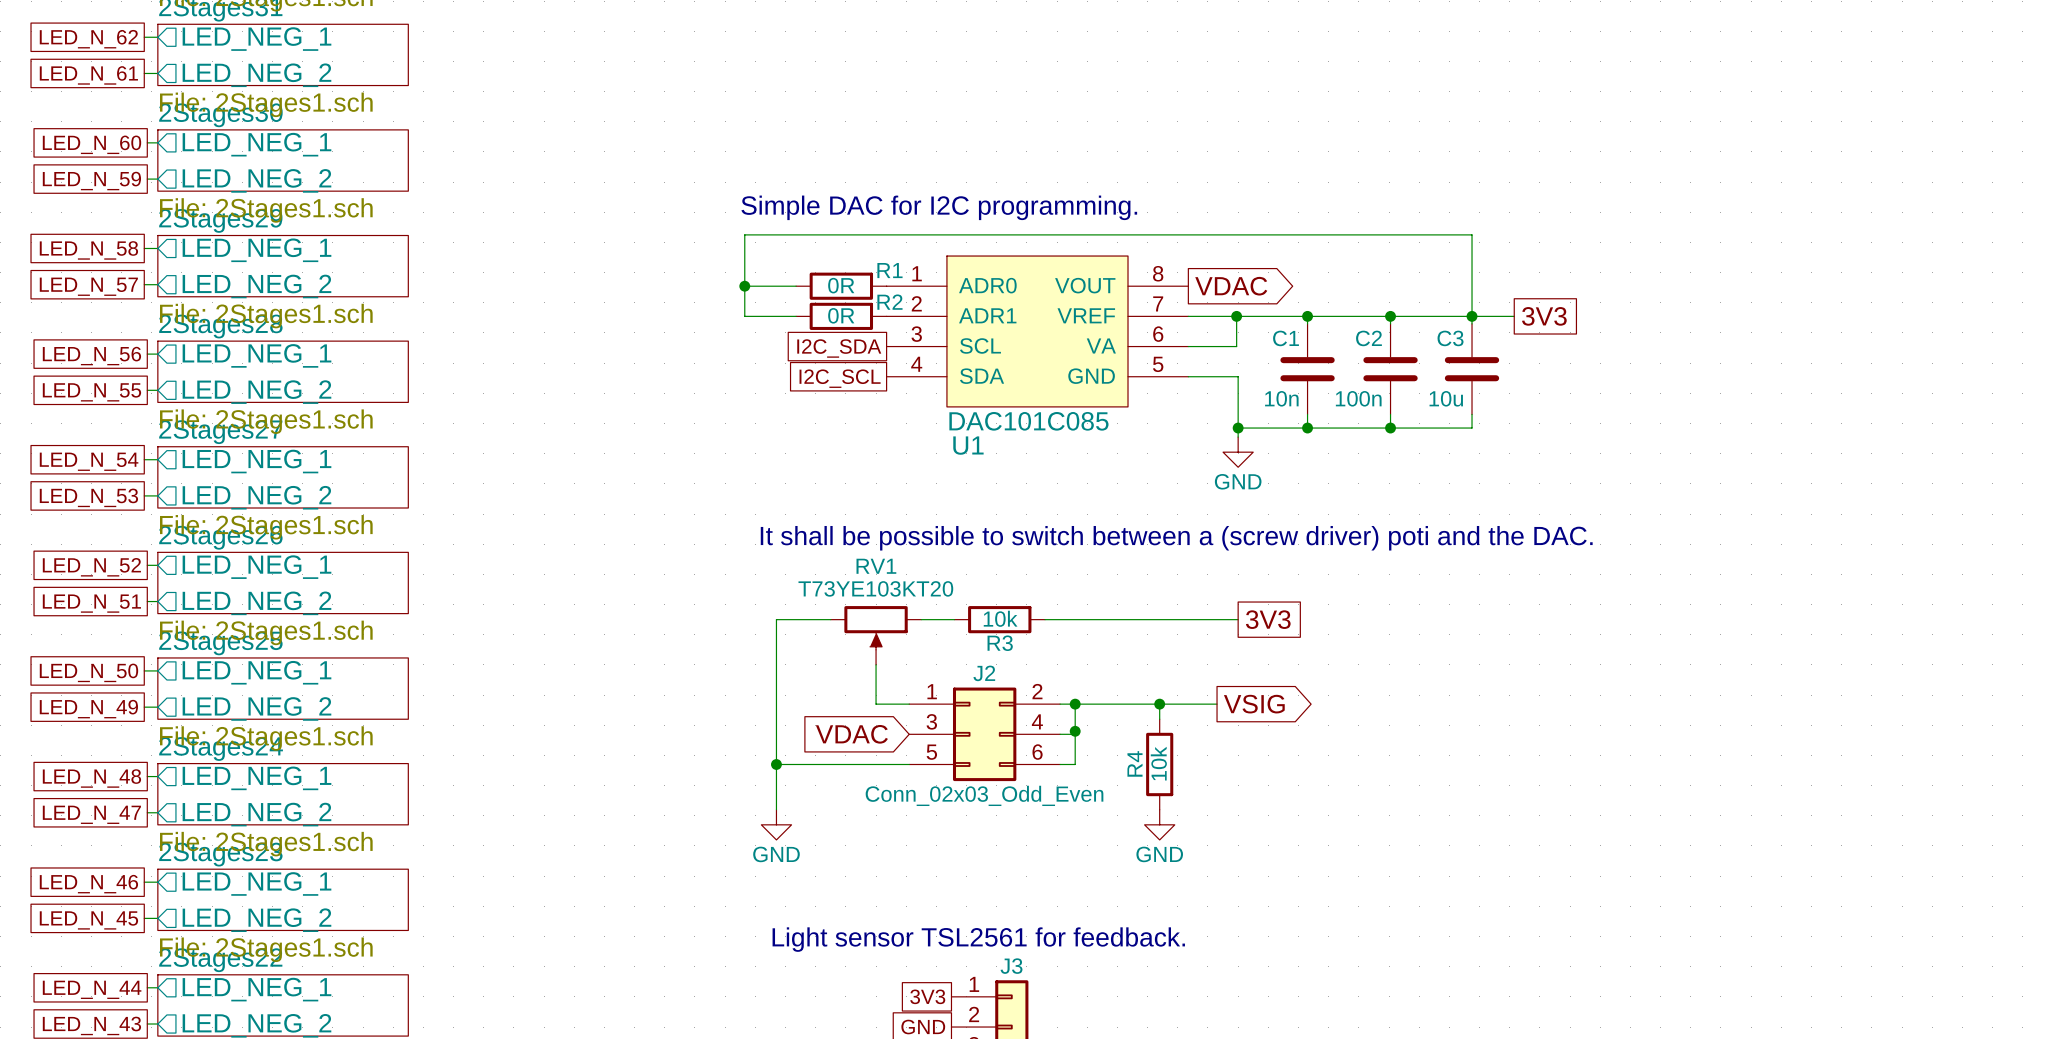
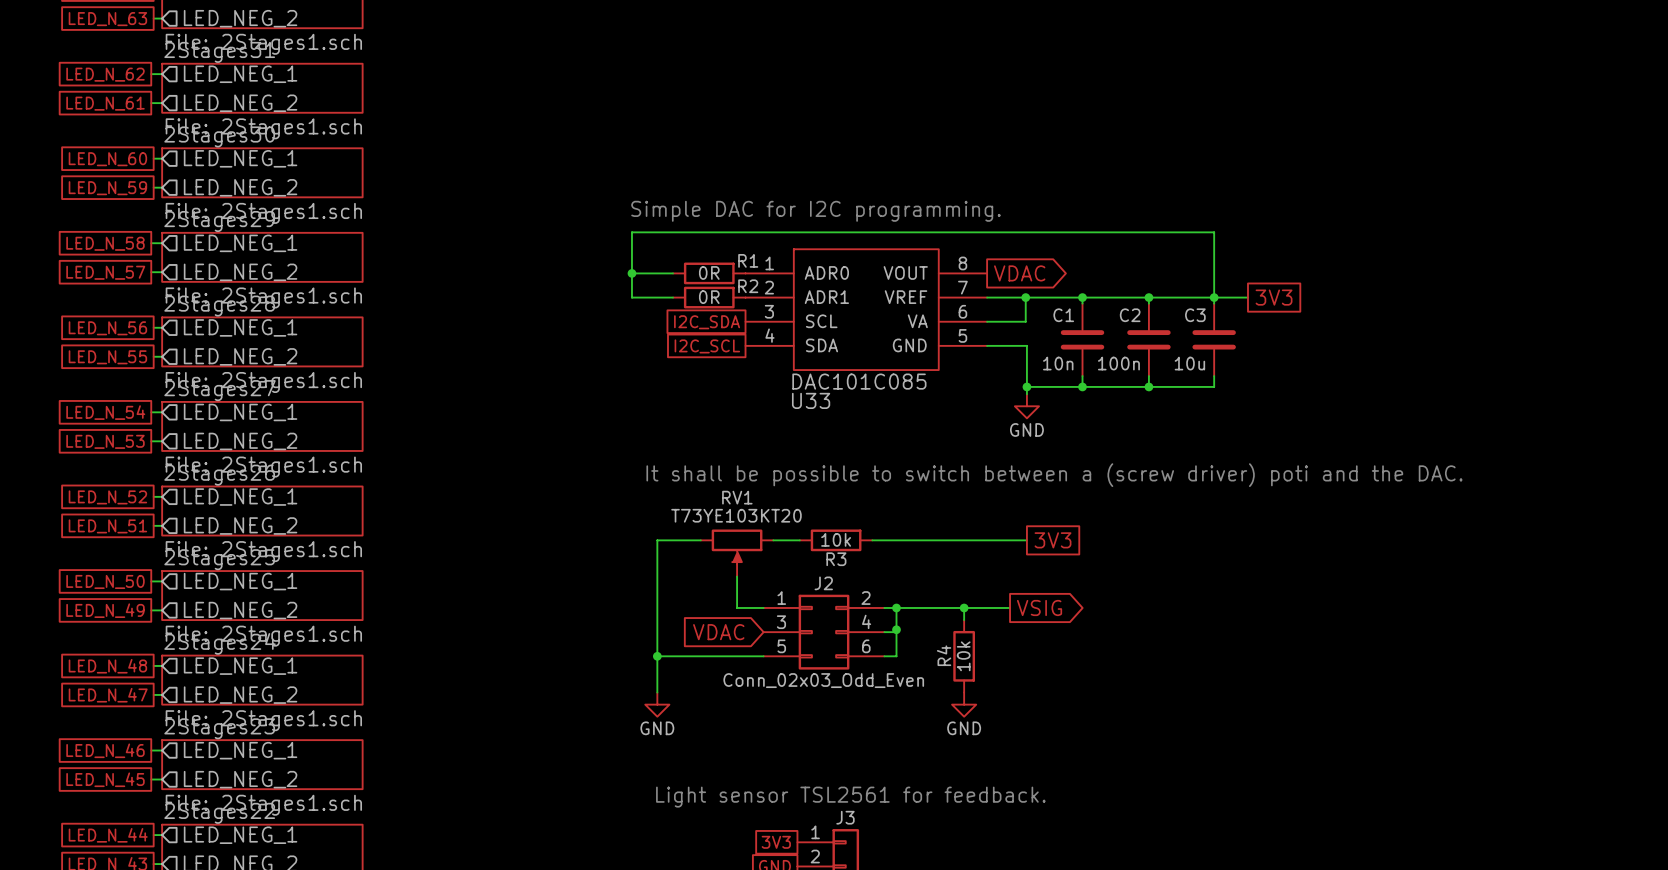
U1 name: U1 (968, 445) -> U33 (811, 400)

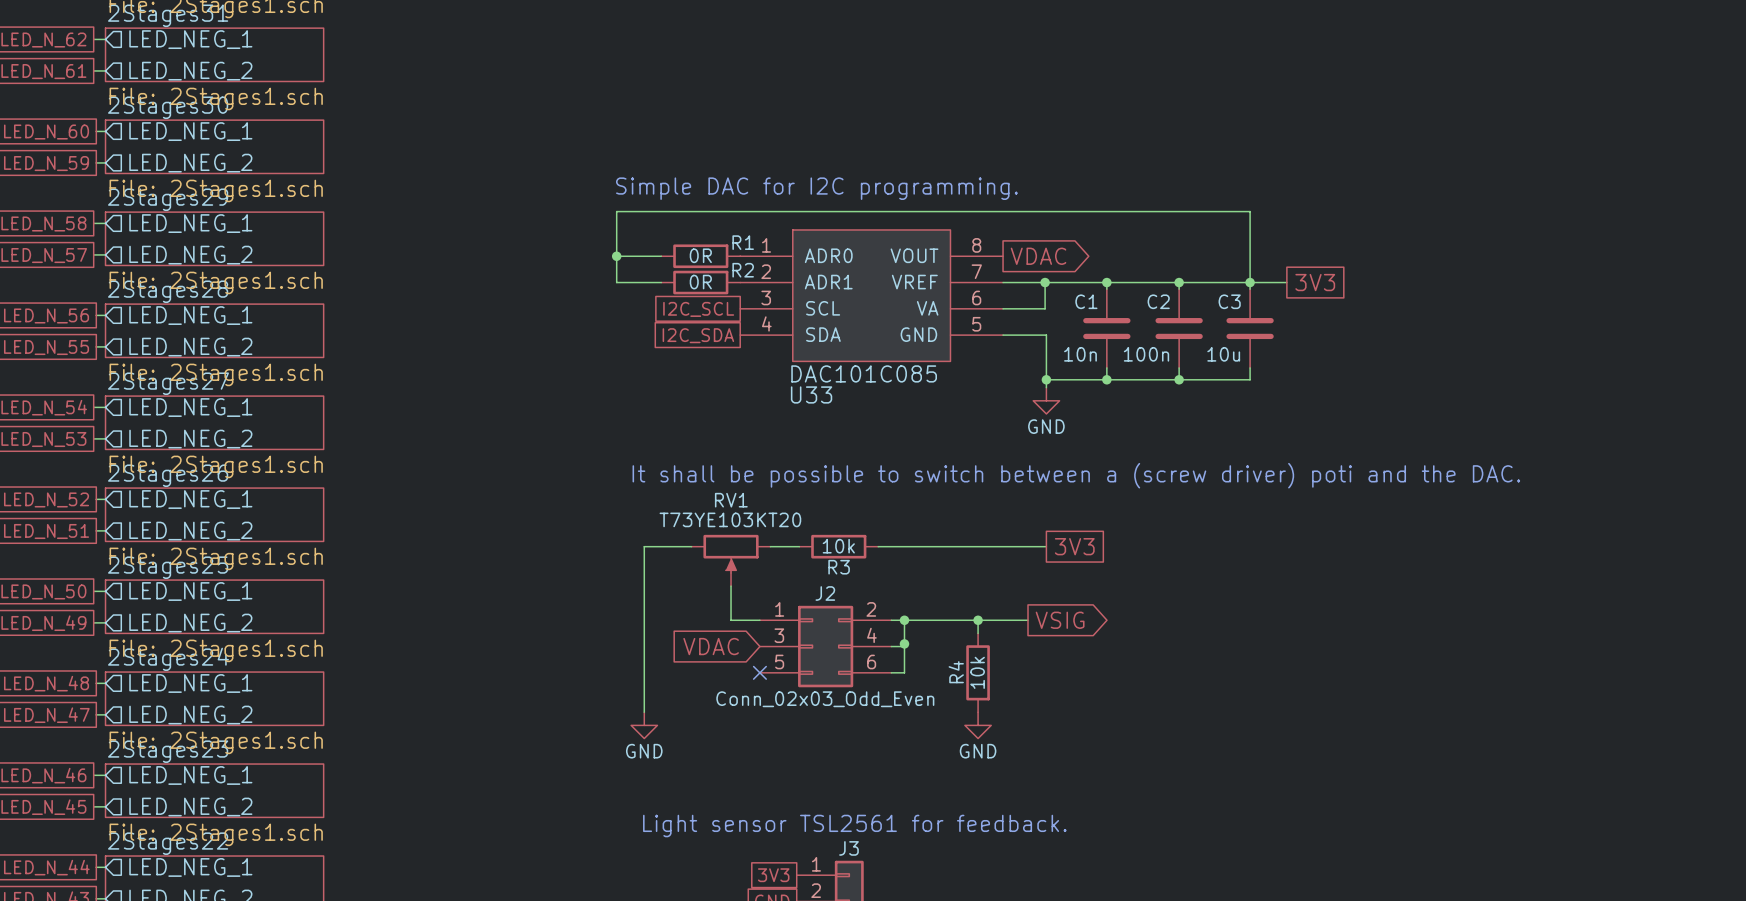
global label: I2C_SDA (707, 322) -> I2C_SCL (698, 309)
global label: I2C_SCL (707, 346) -> I2C_SDA (698, 335)
wire: (657, 656) (763, 656) -> none
junction: (657, 656) -> none
no-connect mark: none -> (759, 672)

